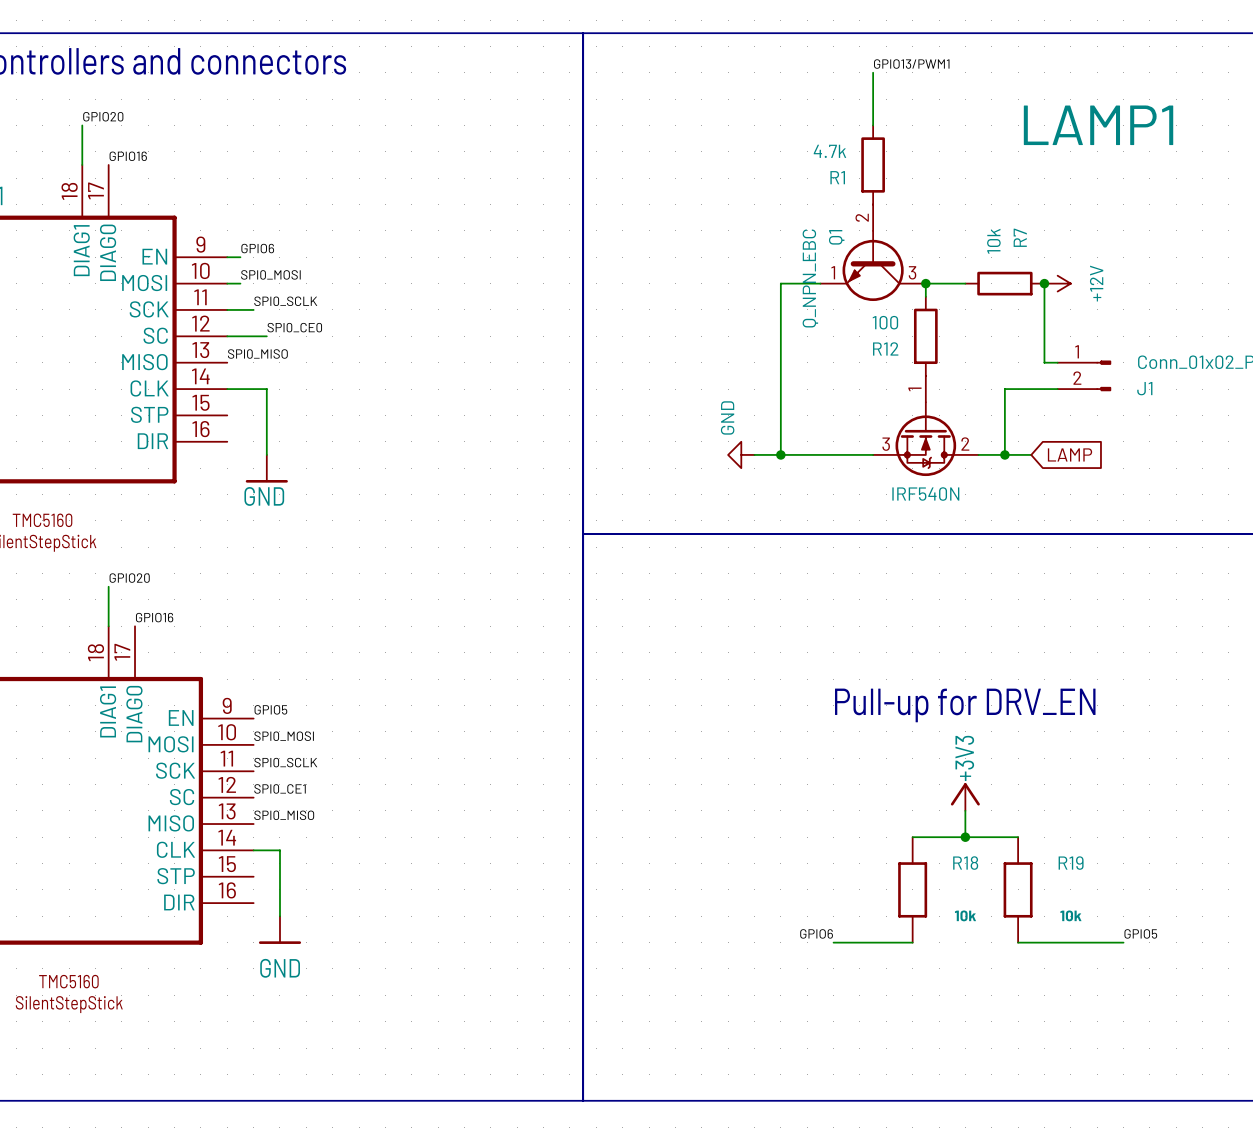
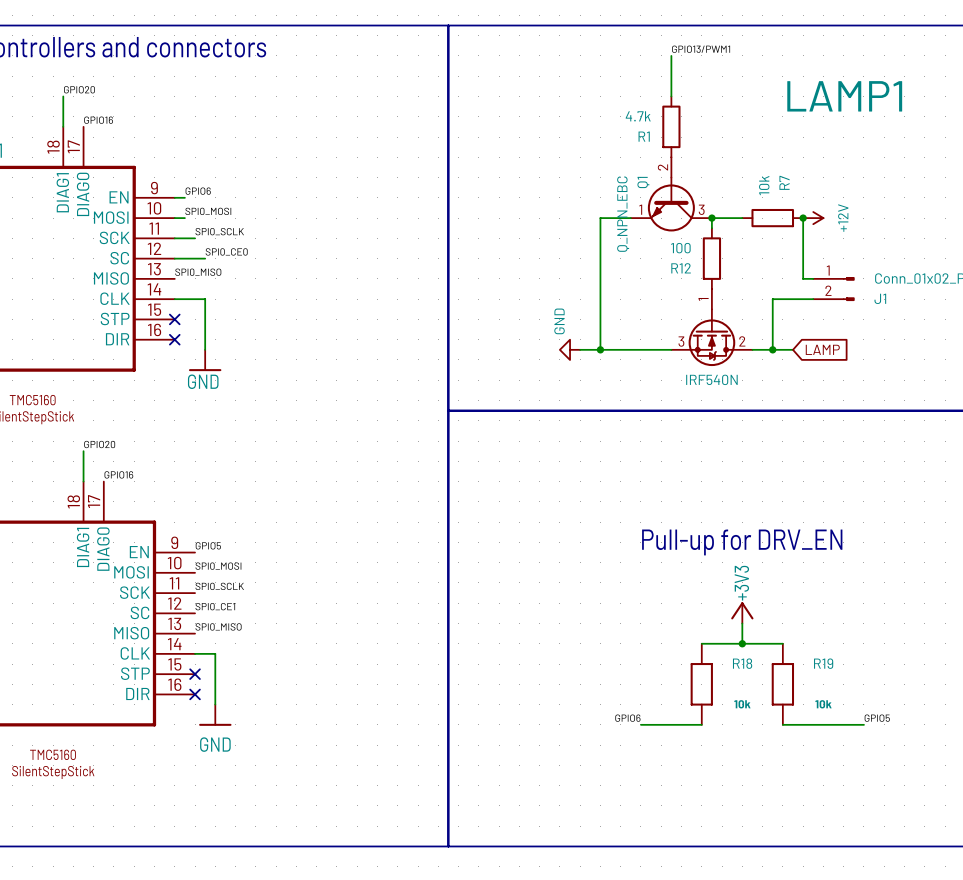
no-connect mark: none -> (174, 319)
no-connect mark: none -> (174, 339)
no-connect mark: none -> (195, 674)
no-connect mark: none -> (195, 694)

